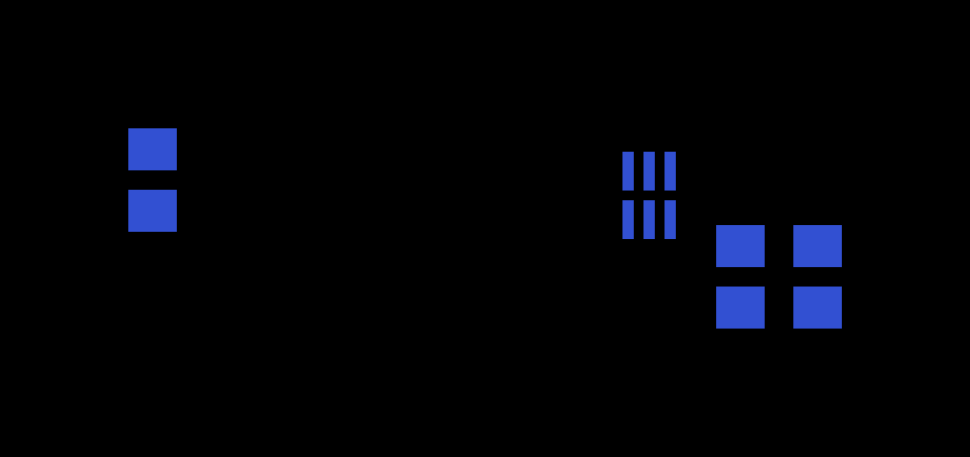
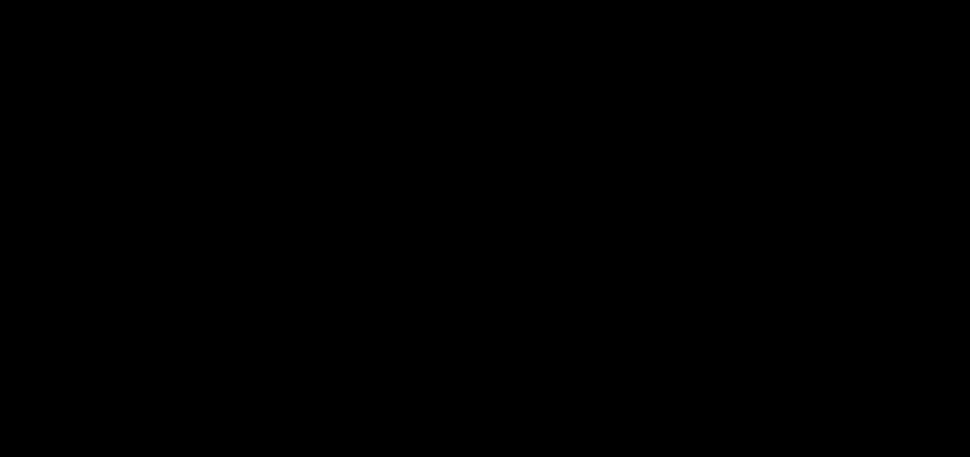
part: (152, 180) -> none
part: (649, 195) -> none
part: (740, 276) -> none
part: (817, 276) -> none

